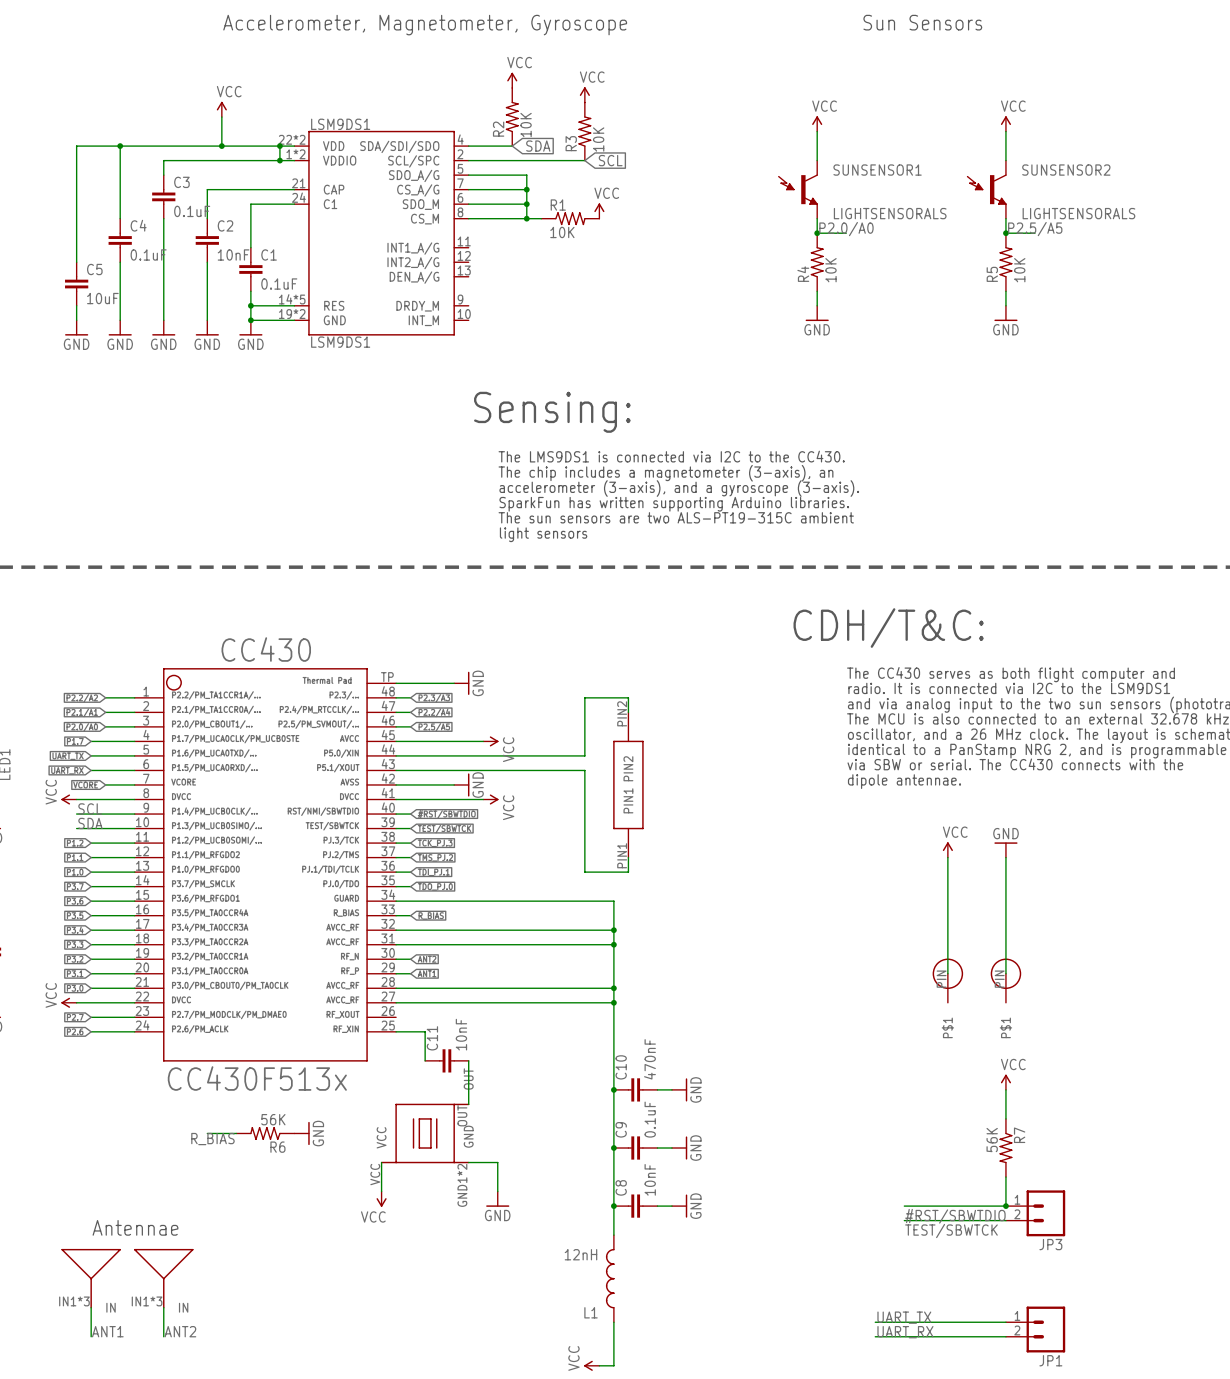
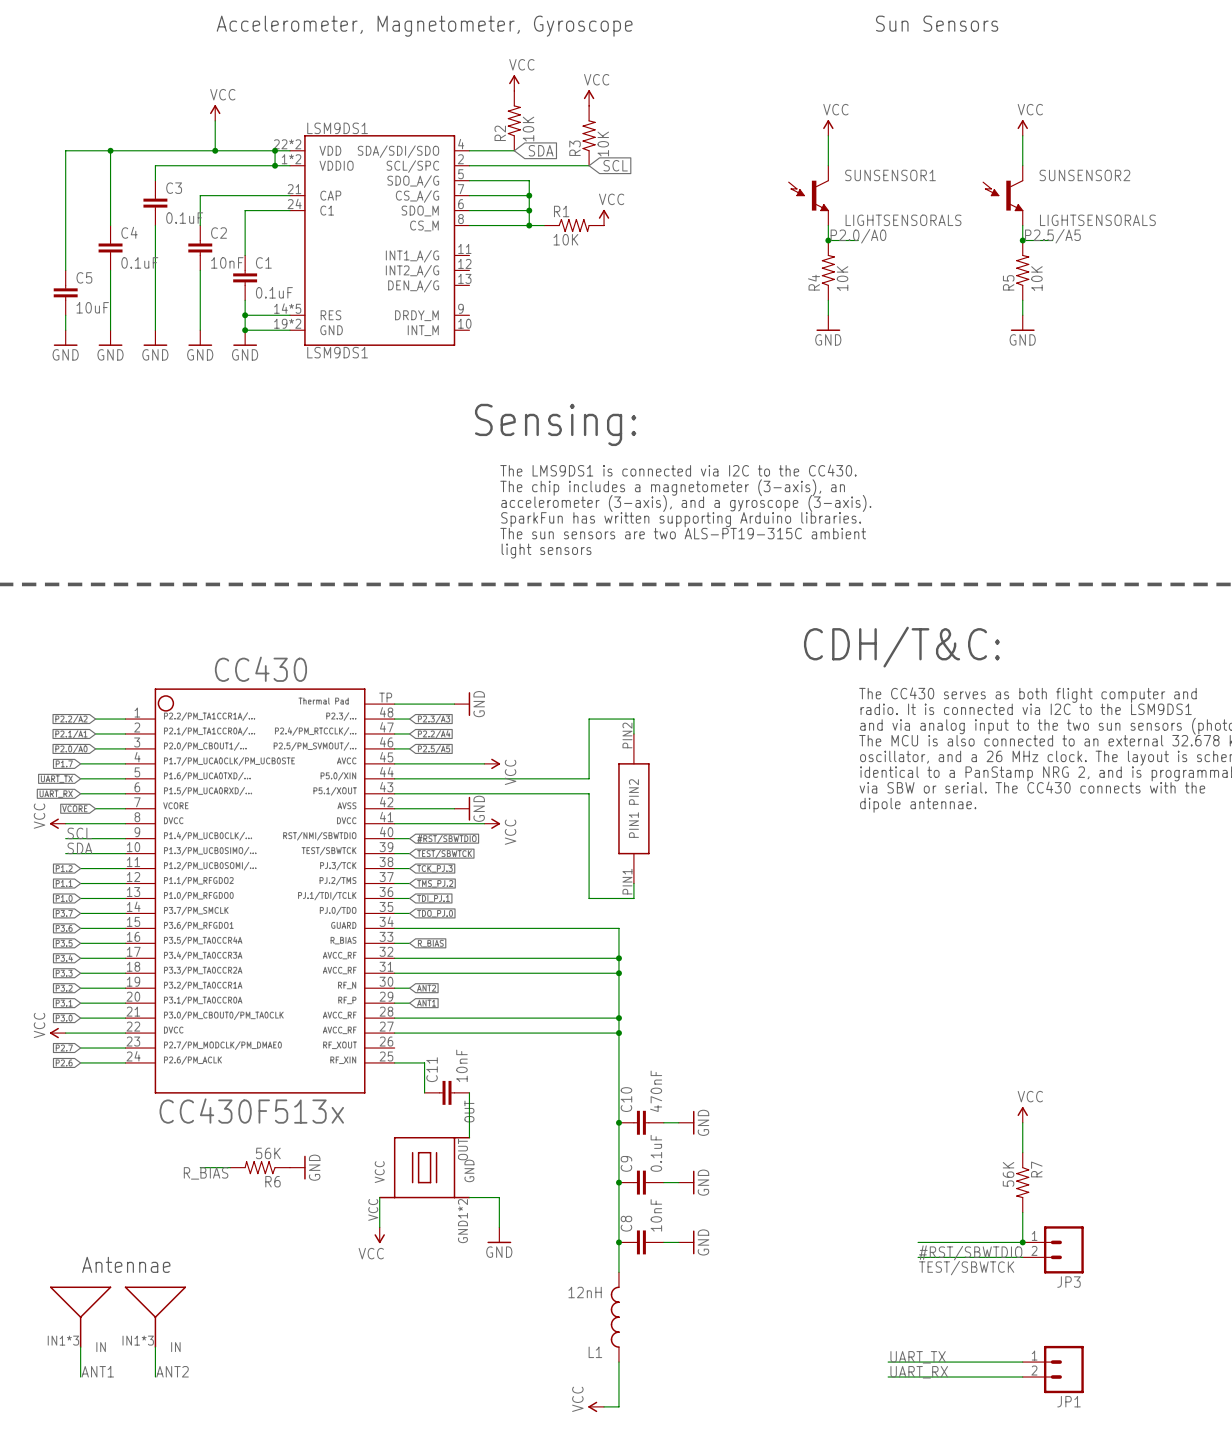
power symbol: VCC (947, 849) -> none
power symbol: GND (1005, 849) -> none
wire: (947, 857) (947, 973) -> none
wire: (1005, 857) (1005, 973) -> none
part: (947, 980) -> none
part: (1005, 980) -> none

